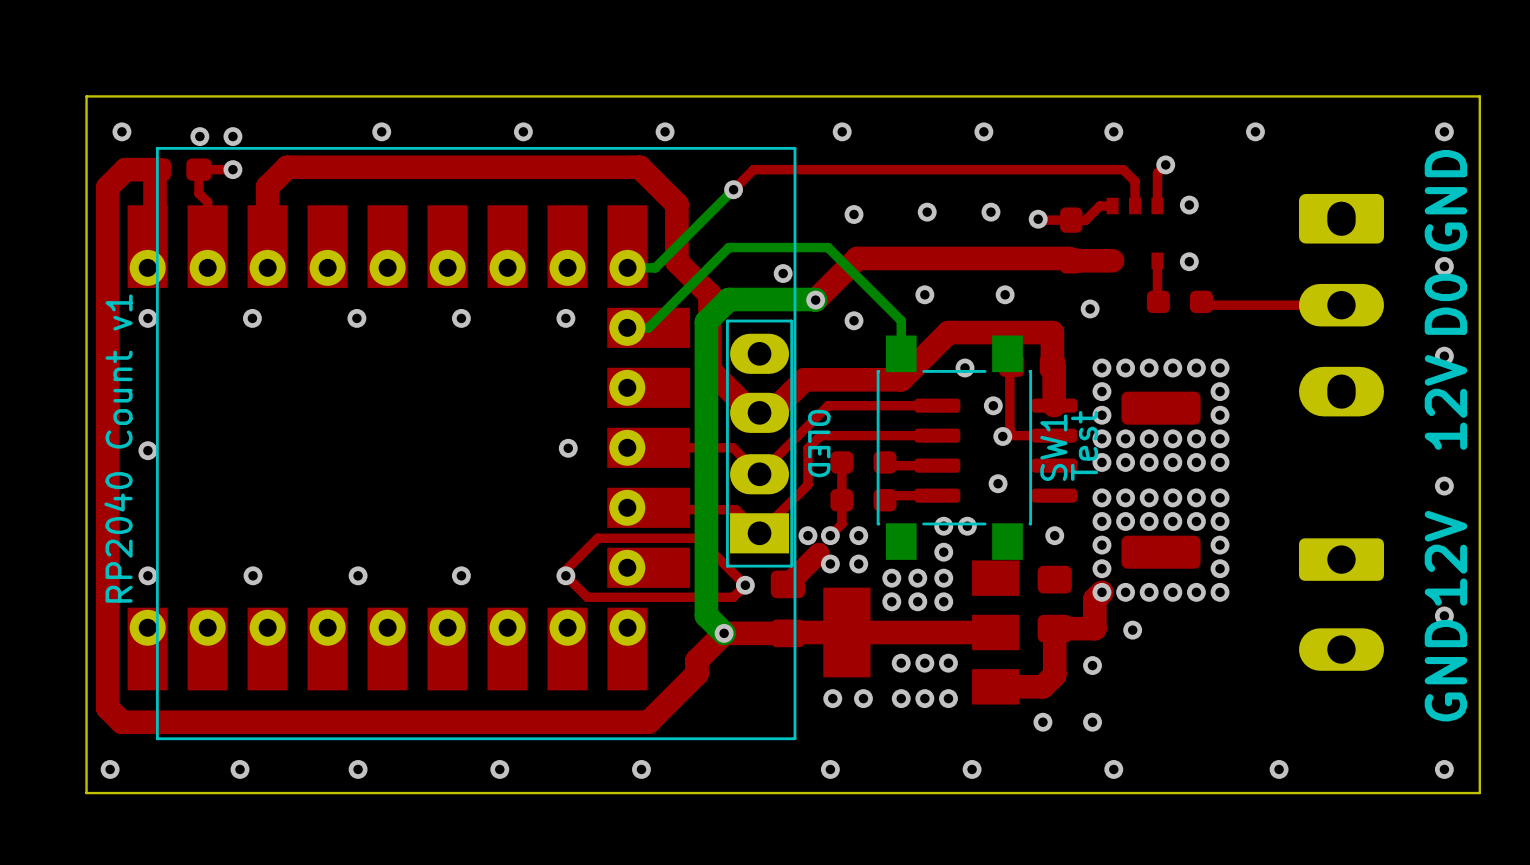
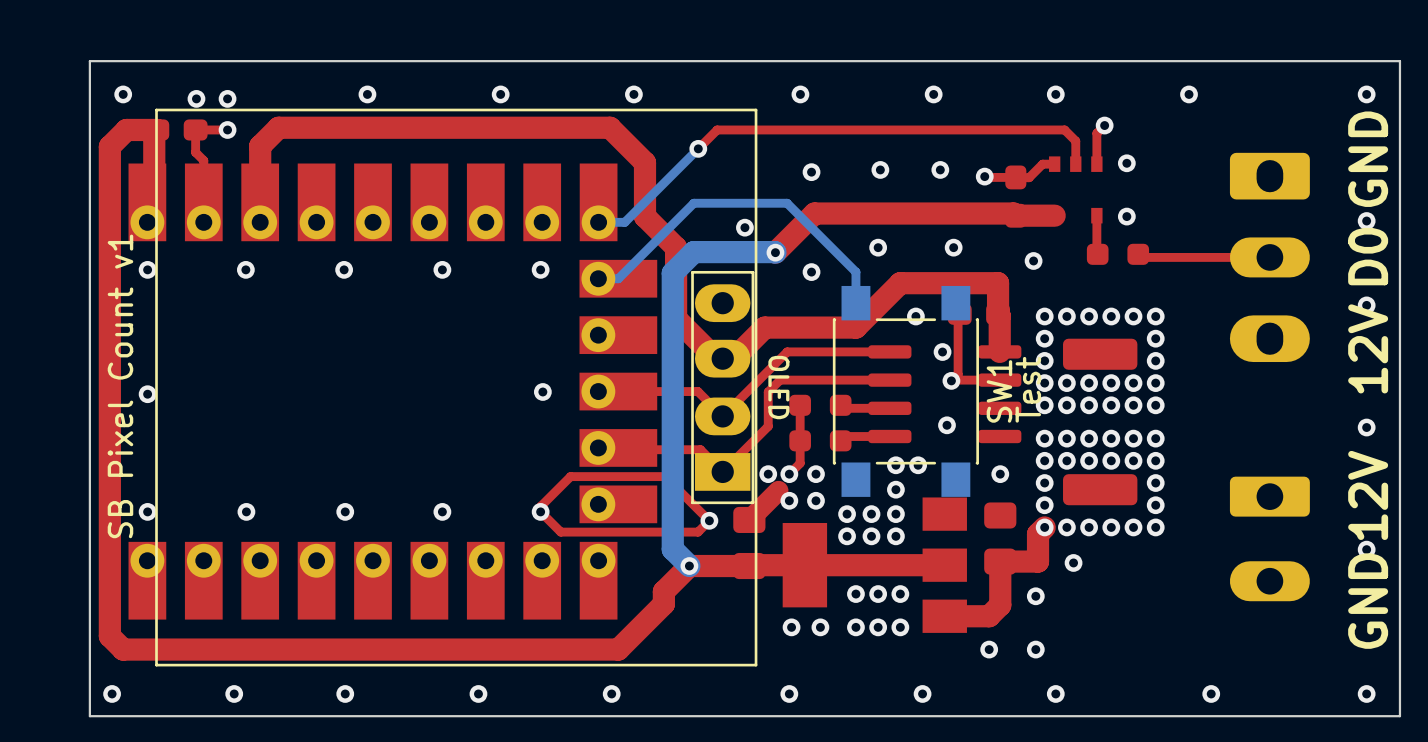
text: RP2040 Count v1 (118, 448) -> SB Pixel Count v1 (120, 386)

